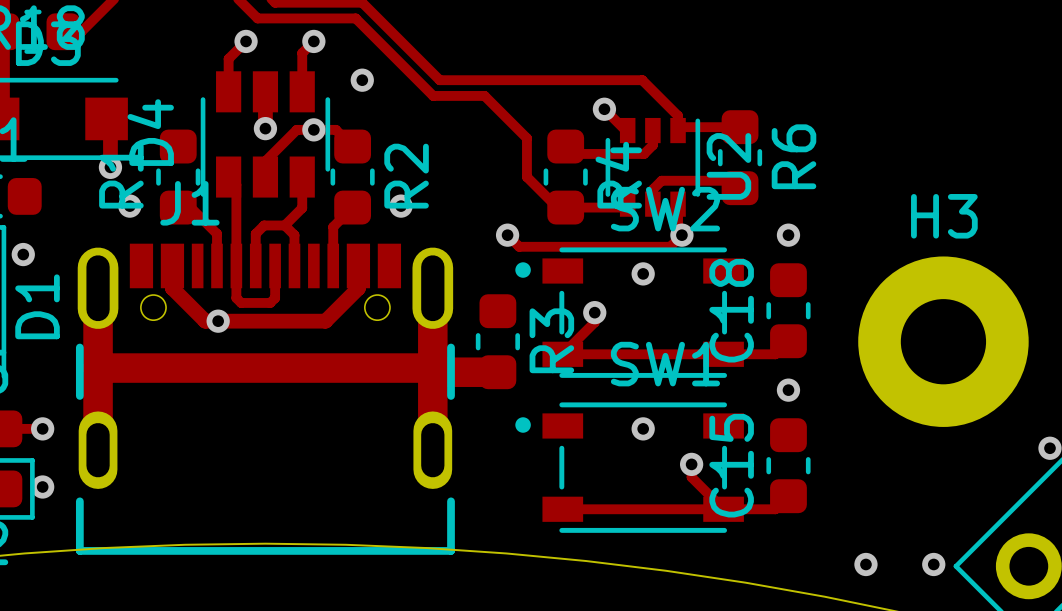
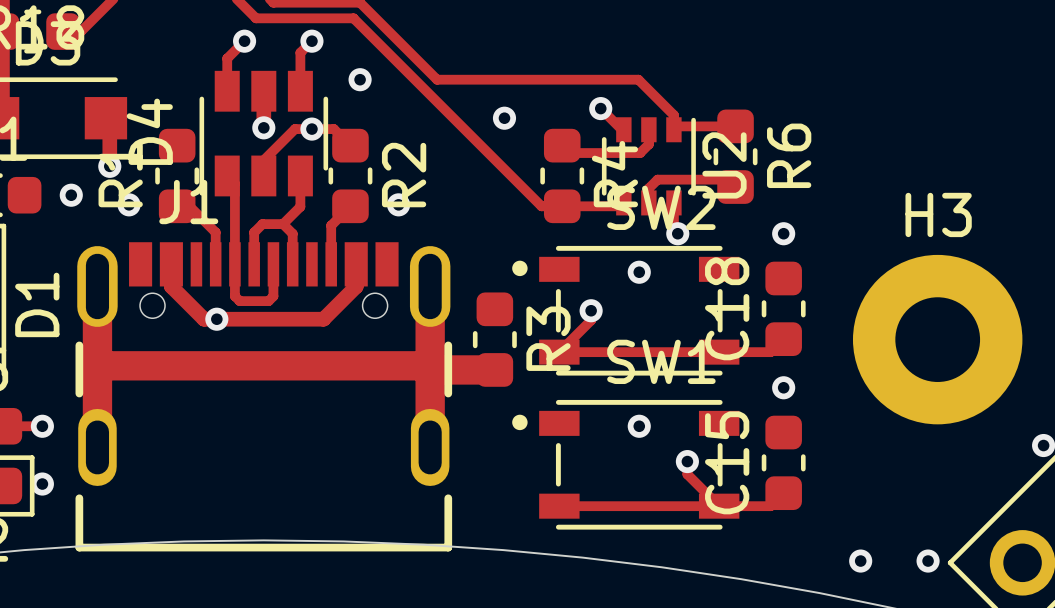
track: (433, 95) (484, 95) (526, 138) (526, 177) (557, 207) -> (430, 95) (541, 206) (554, 206)
track: (507, 235) (519, 246) (670, 246) (681, 235) -> none
via position: (507, 235) -> (504, 118)
via position: (23, 254) -> (71, 195)

